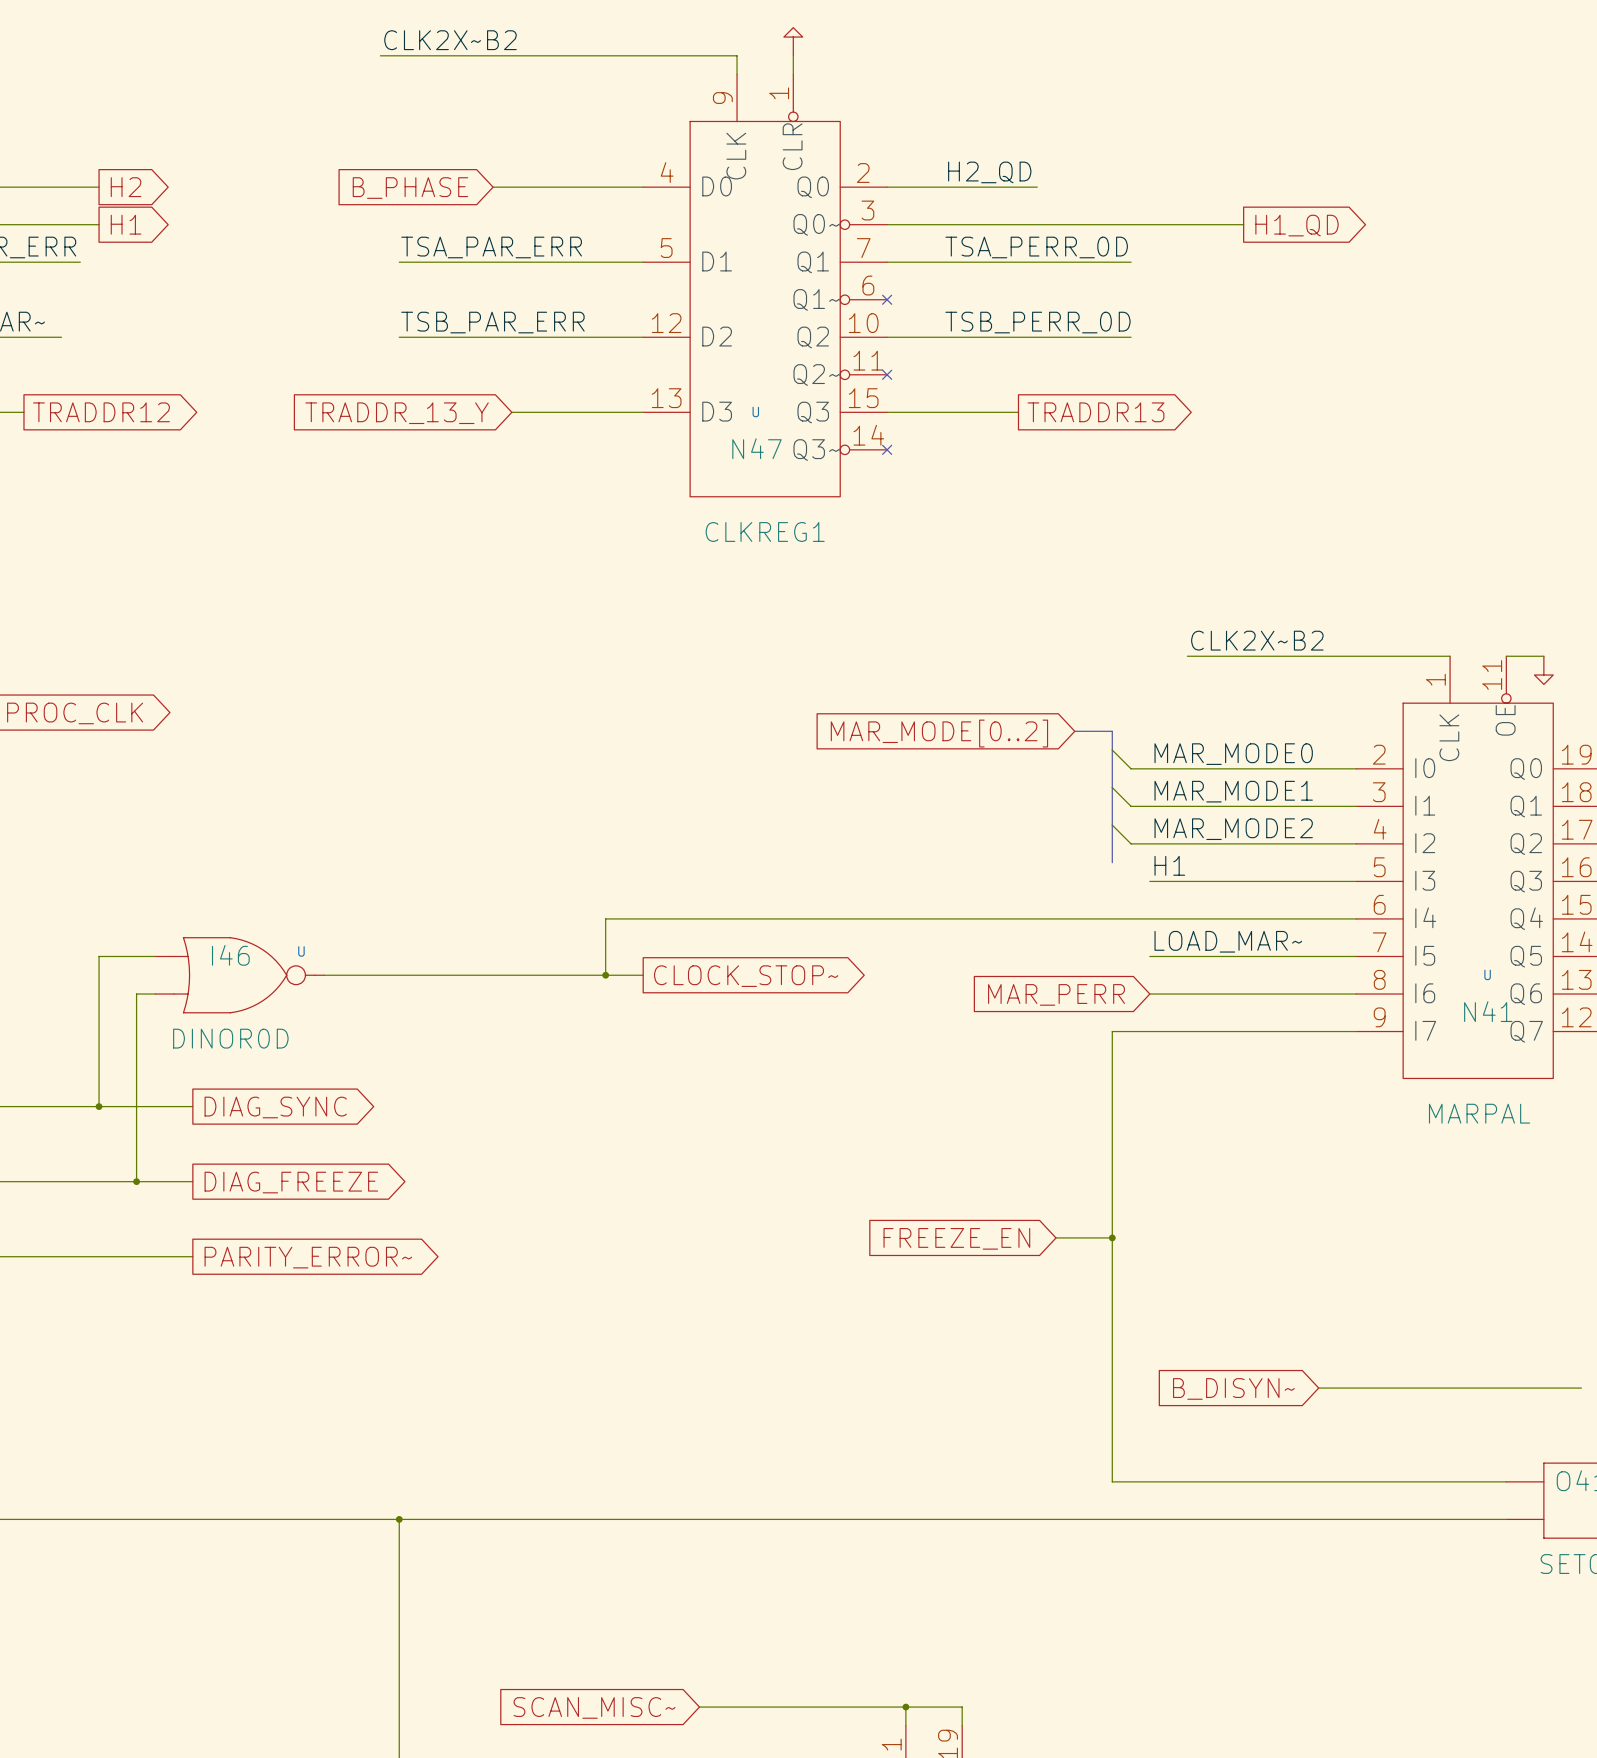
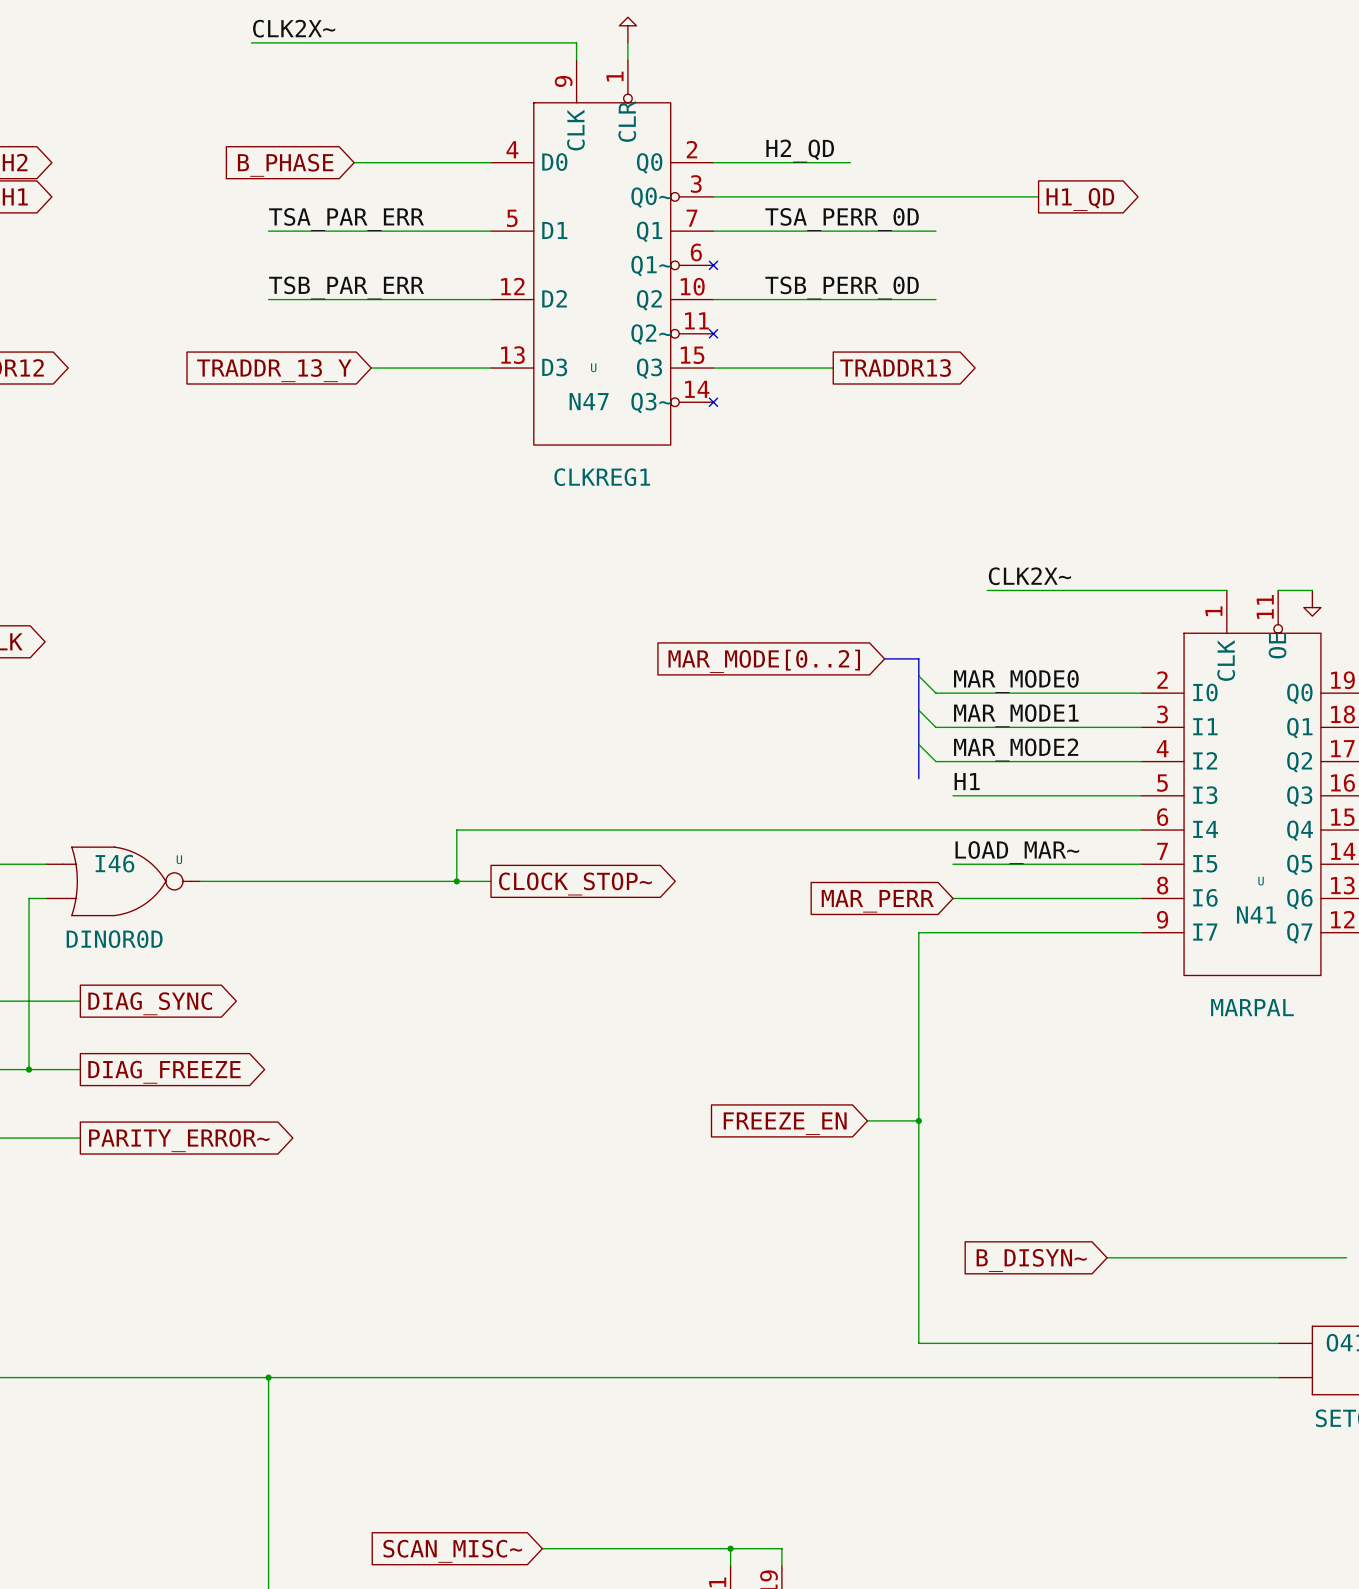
label: CLK2X~B2 (450, 40) -> CLK2X~ (294, 28)
label: CLK2X~B2 (1257, 640) -> CLK2X~ (1029, 576)

